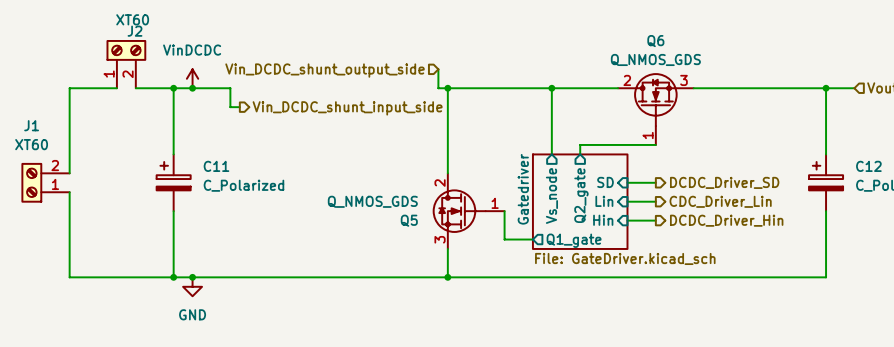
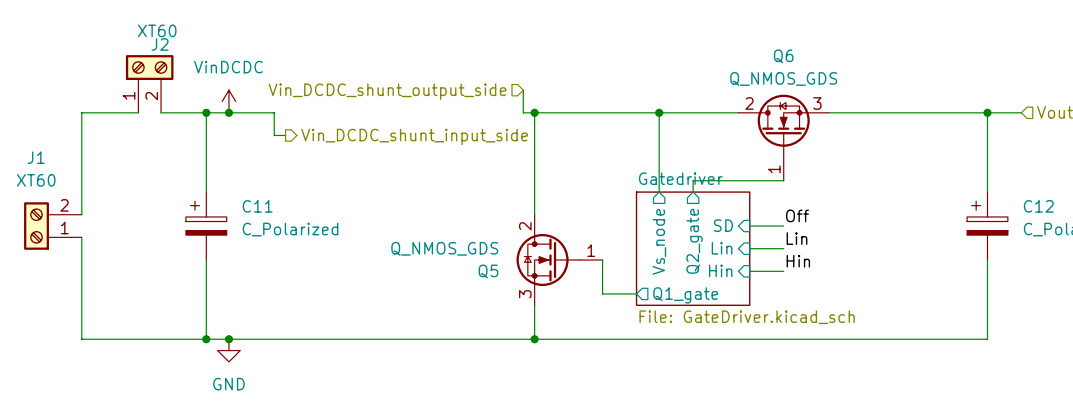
label: none -> Off (797, 215)
hierarchical label: DCDC_Driver_SD (724, 182) -> none
sheet Gatedriver name rotation: 0° (523, 189) -> 90° clockwise (680, 178)
label: none -> Lin (796, 238)
hierarchical label: CDC_Driver_Lin (720, 201) -> none
label: none -> Hin (798, 261)
hierarchical label: DCDC_Driver_Hin (726, 220) -> none

